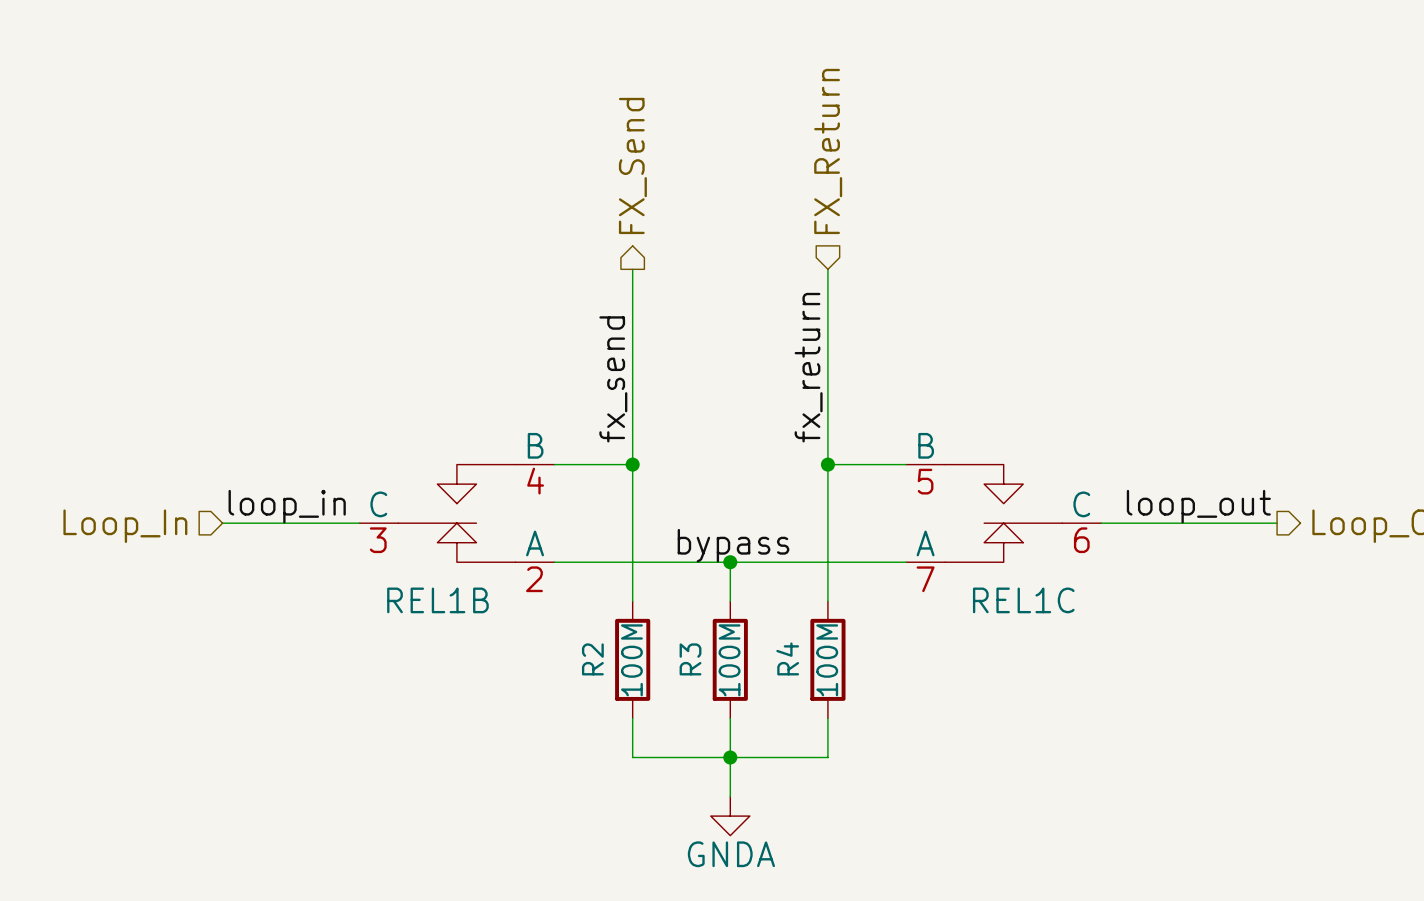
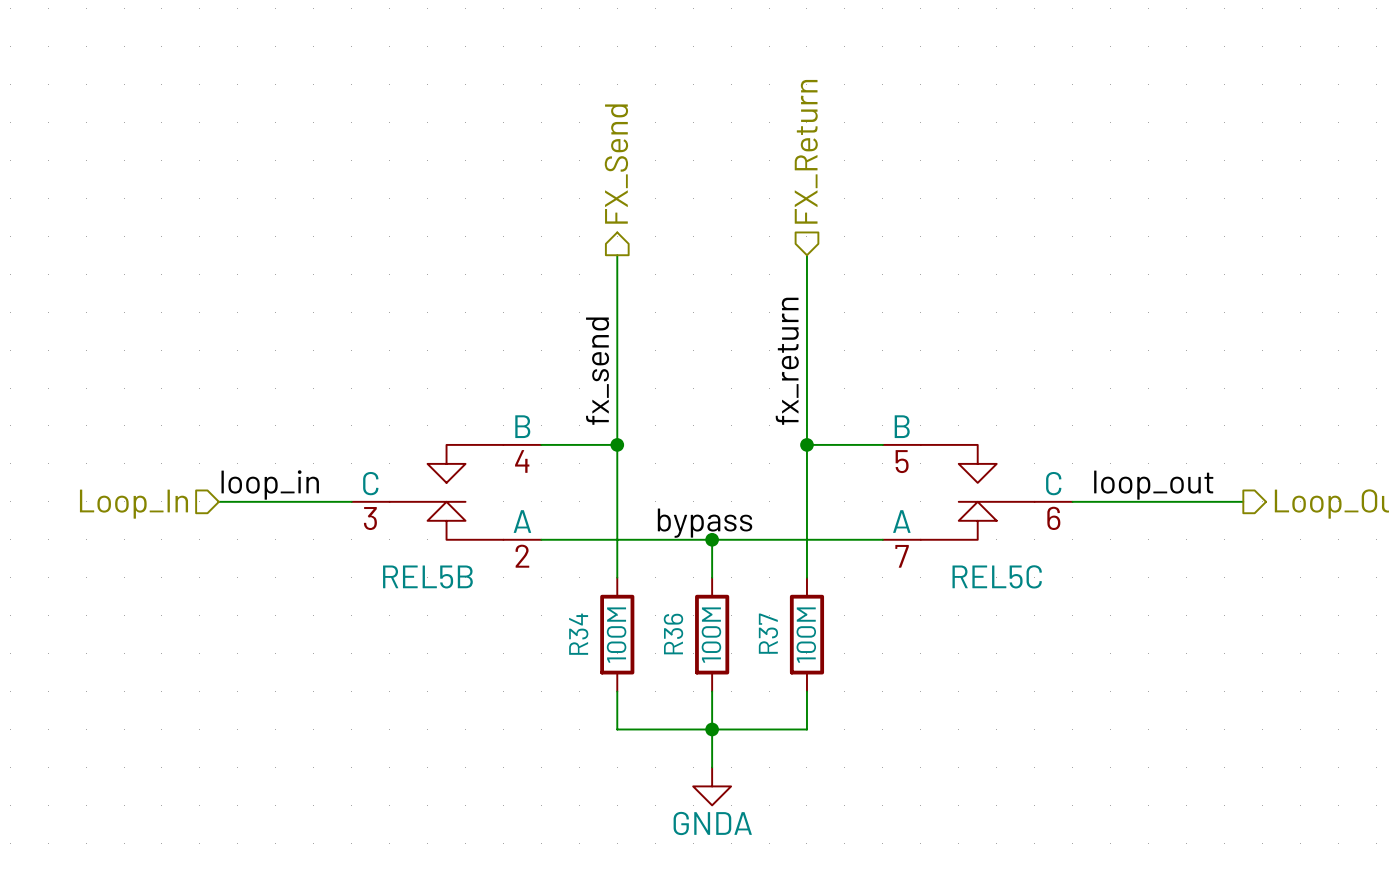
REL1B name: REL1B (437, 600) -> REL5B (427, 576)
REL1C name: REL1C (1023, 600) -> REL5C (997, 576)
R4 name: R4 (787, 658) -> R37 (768, 633)
R2 name: R2 (592, 659) -> R34 (578, 634)
R3 name: R3 (690, 659) -> R36 (673, 634)

